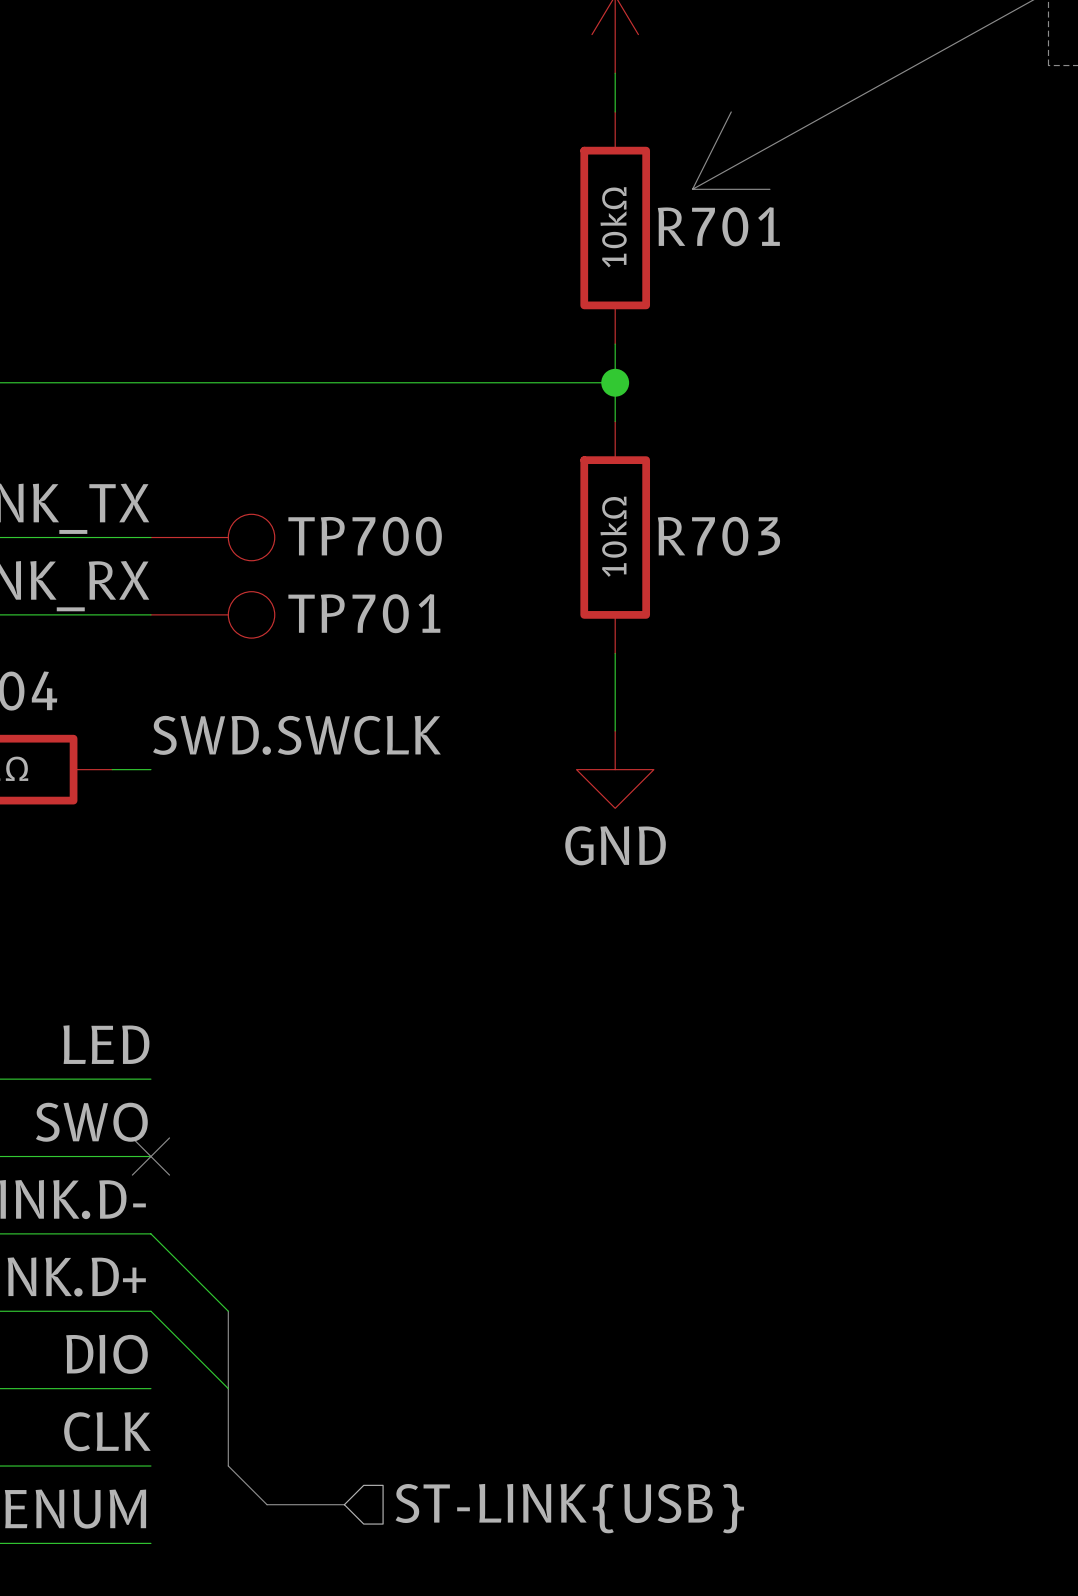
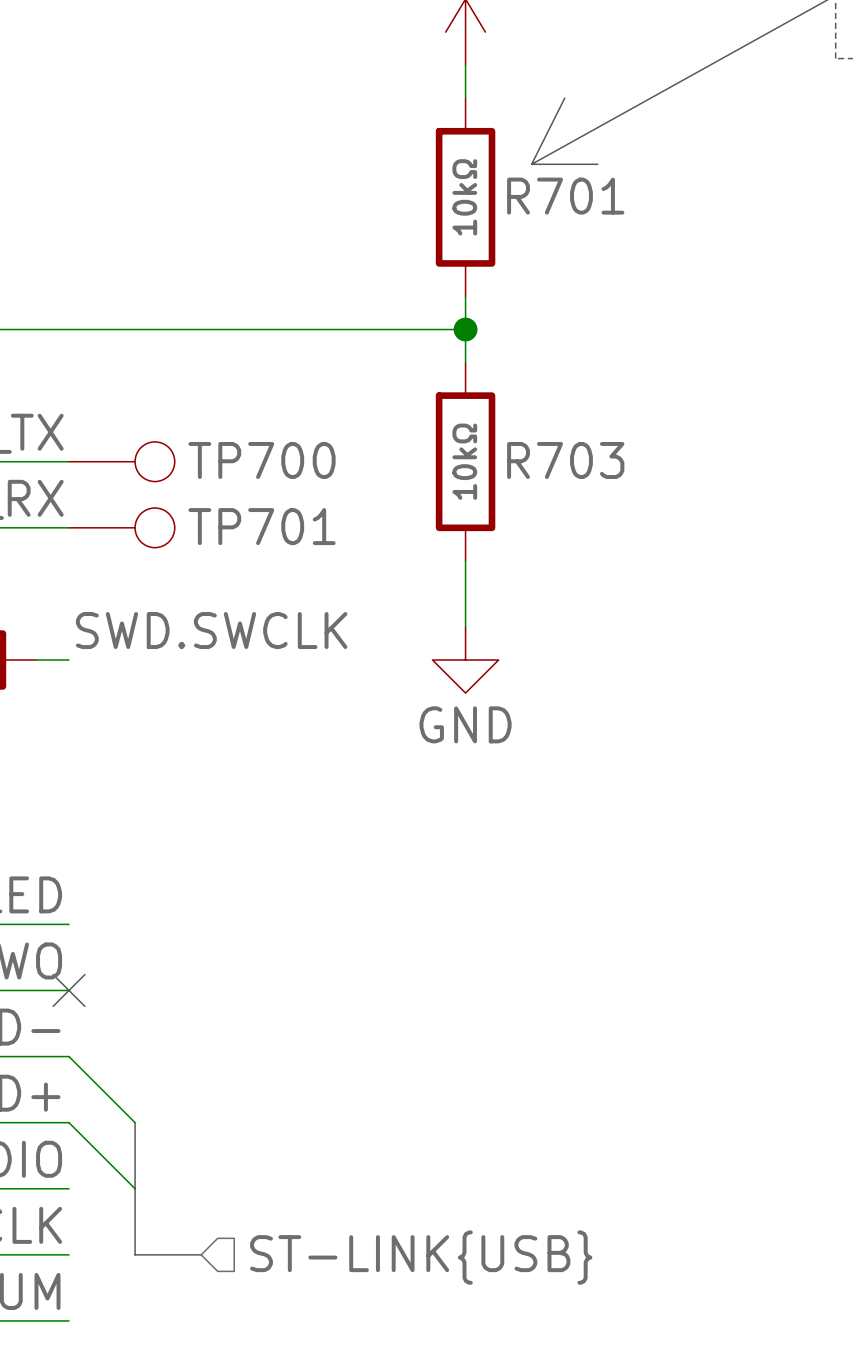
bus: (228, 1466) (267, 1504) (344, 1504) -> (135, 1254) (201, 1254)
hierarchical label position: ST-LINK{USB} (569, 1508) -> ST-LINK{USB} (421, 1257)

